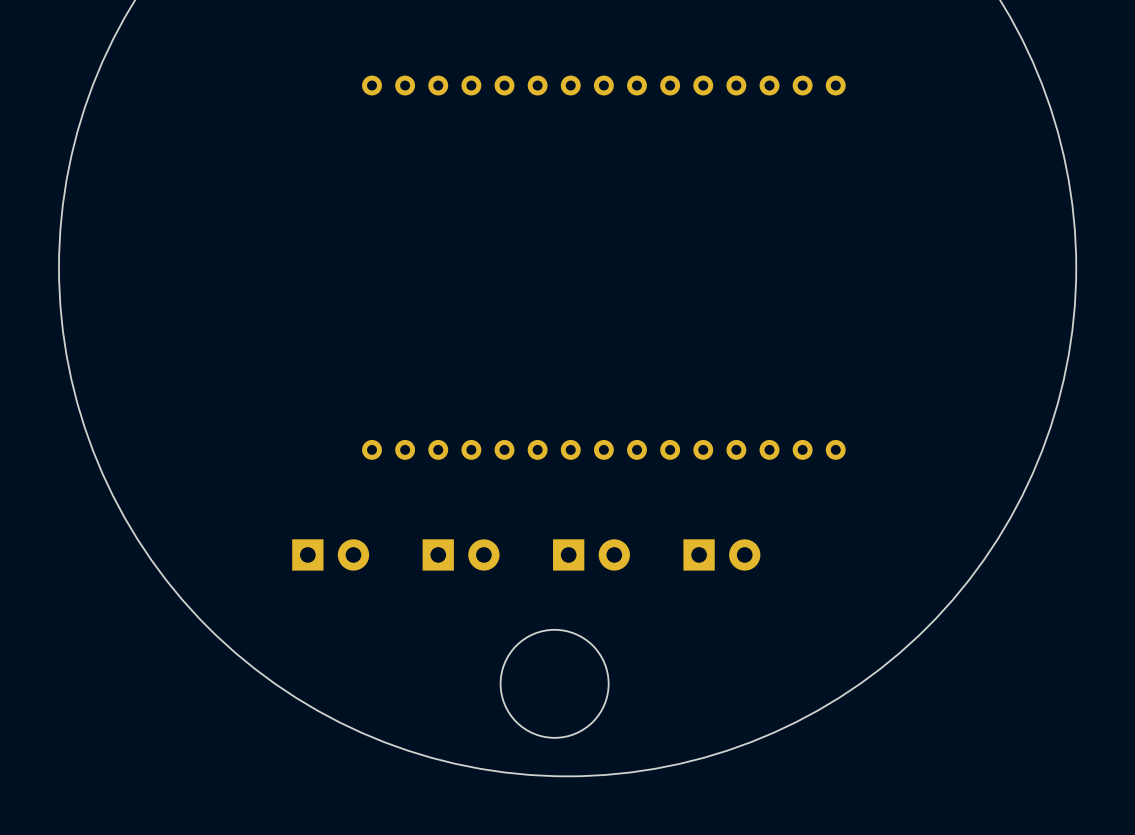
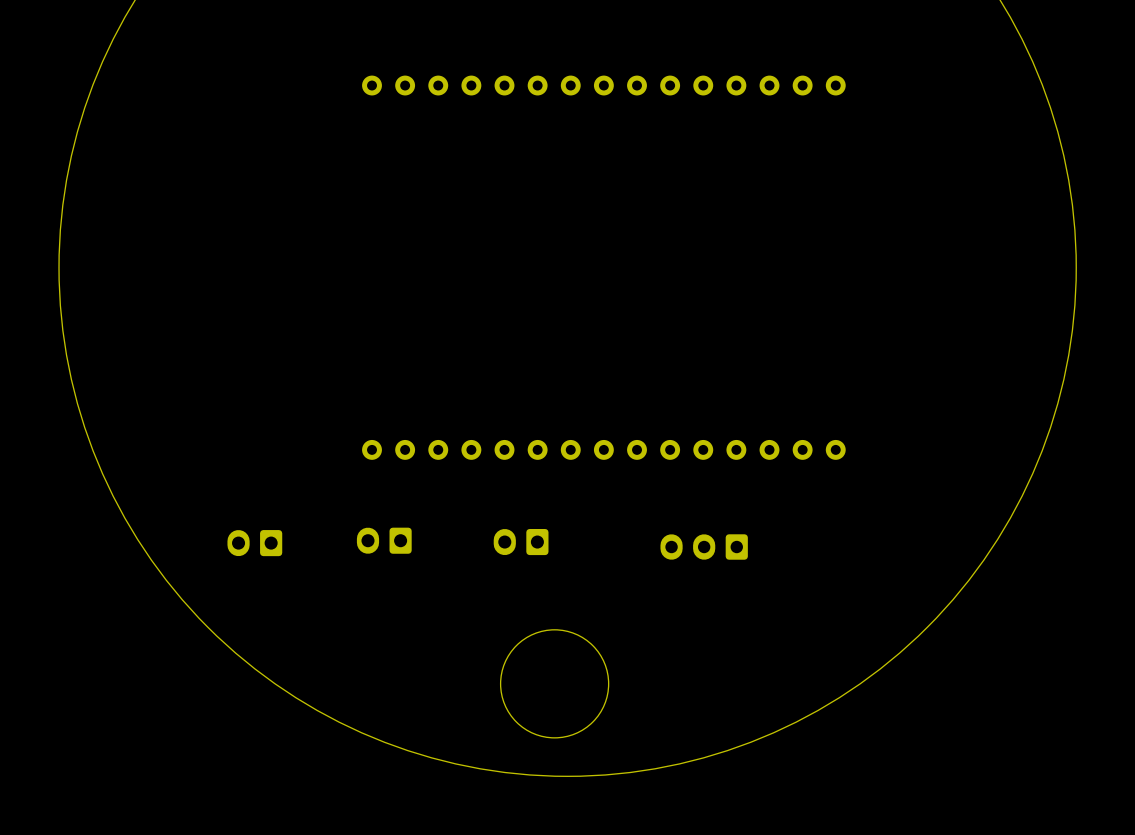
part: none -> (384, 540)
part: none -> (521, 542)
part: none -> (254, 543)
part: none -> (704, 547)
part: (330, 554) -> none
part: (461, 554) -> none
part: (591, 554) -> none
part: (721, 554) -> none

